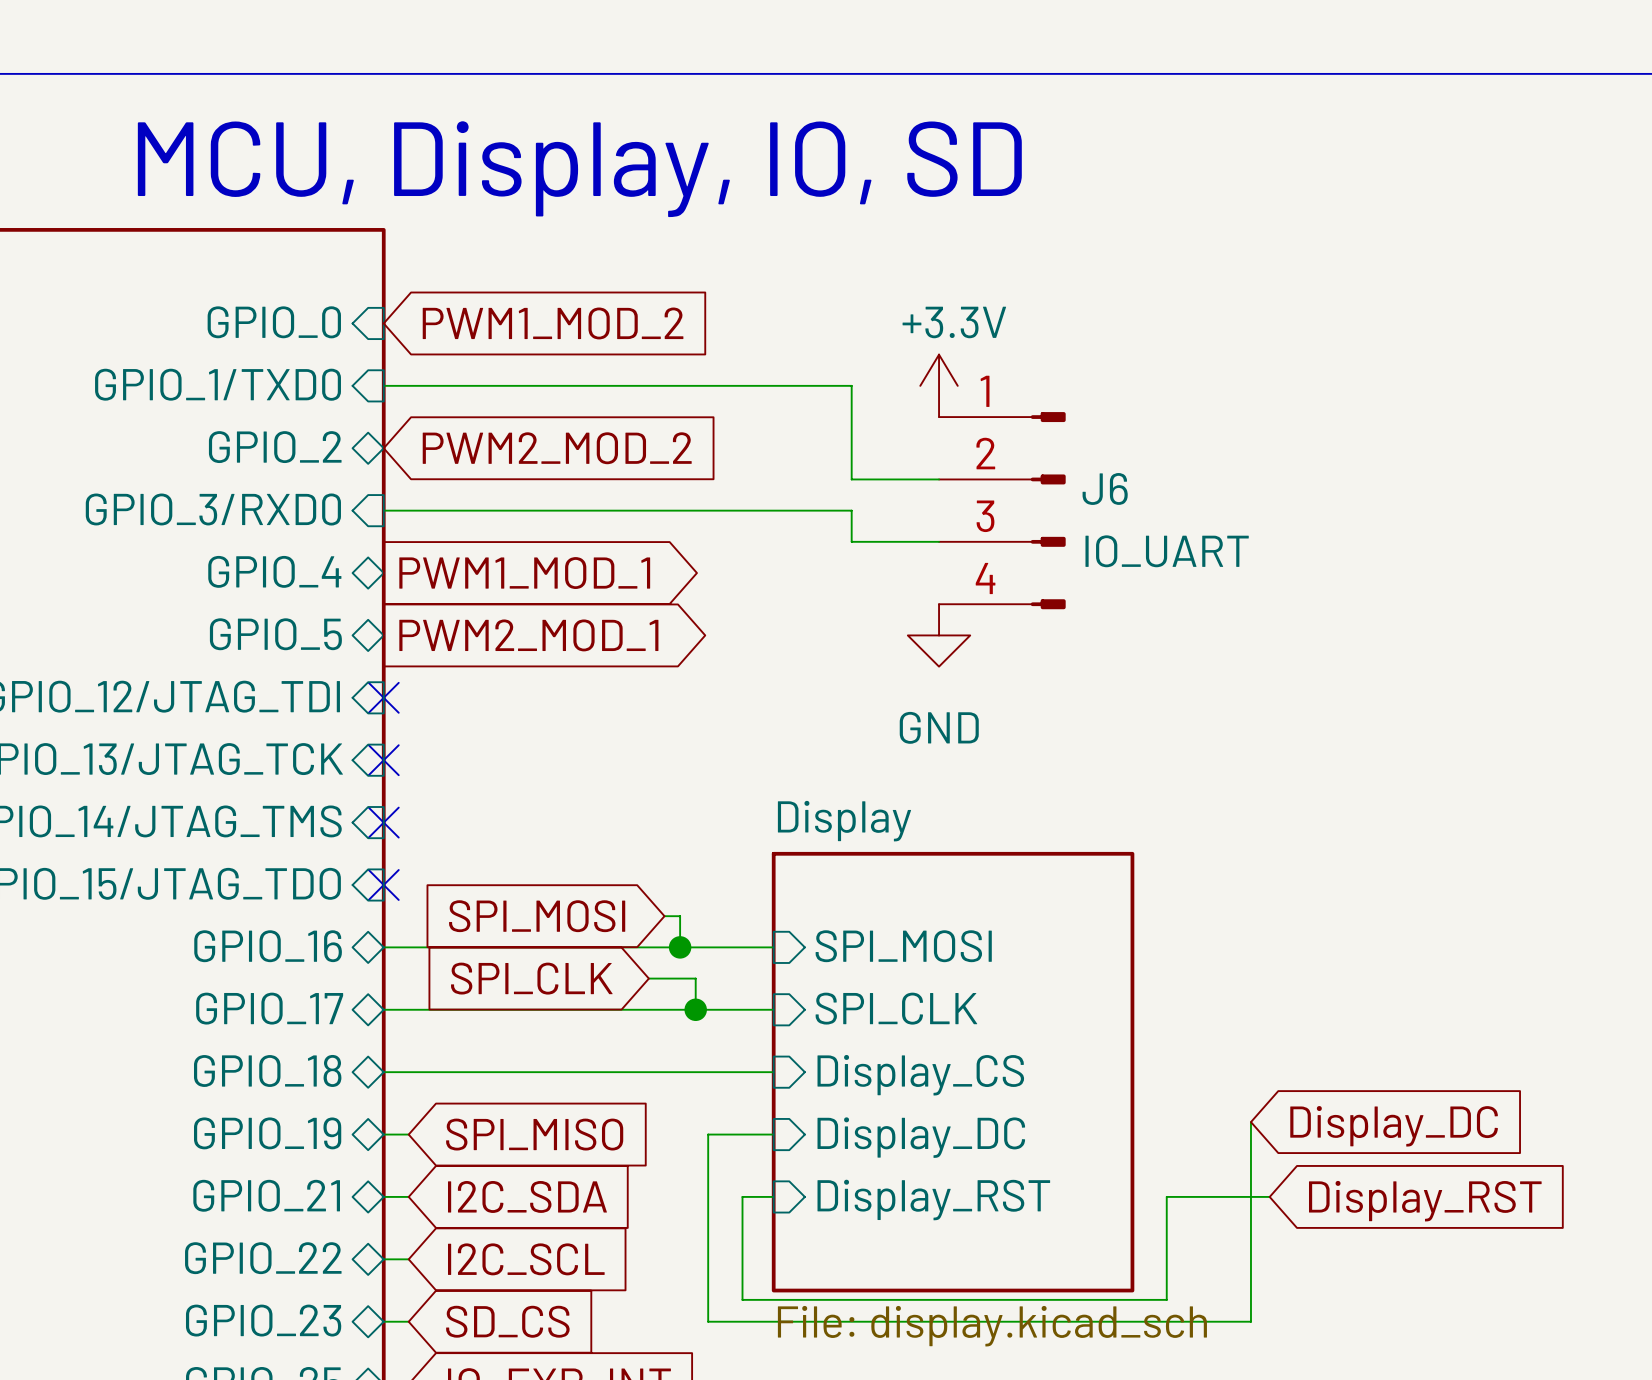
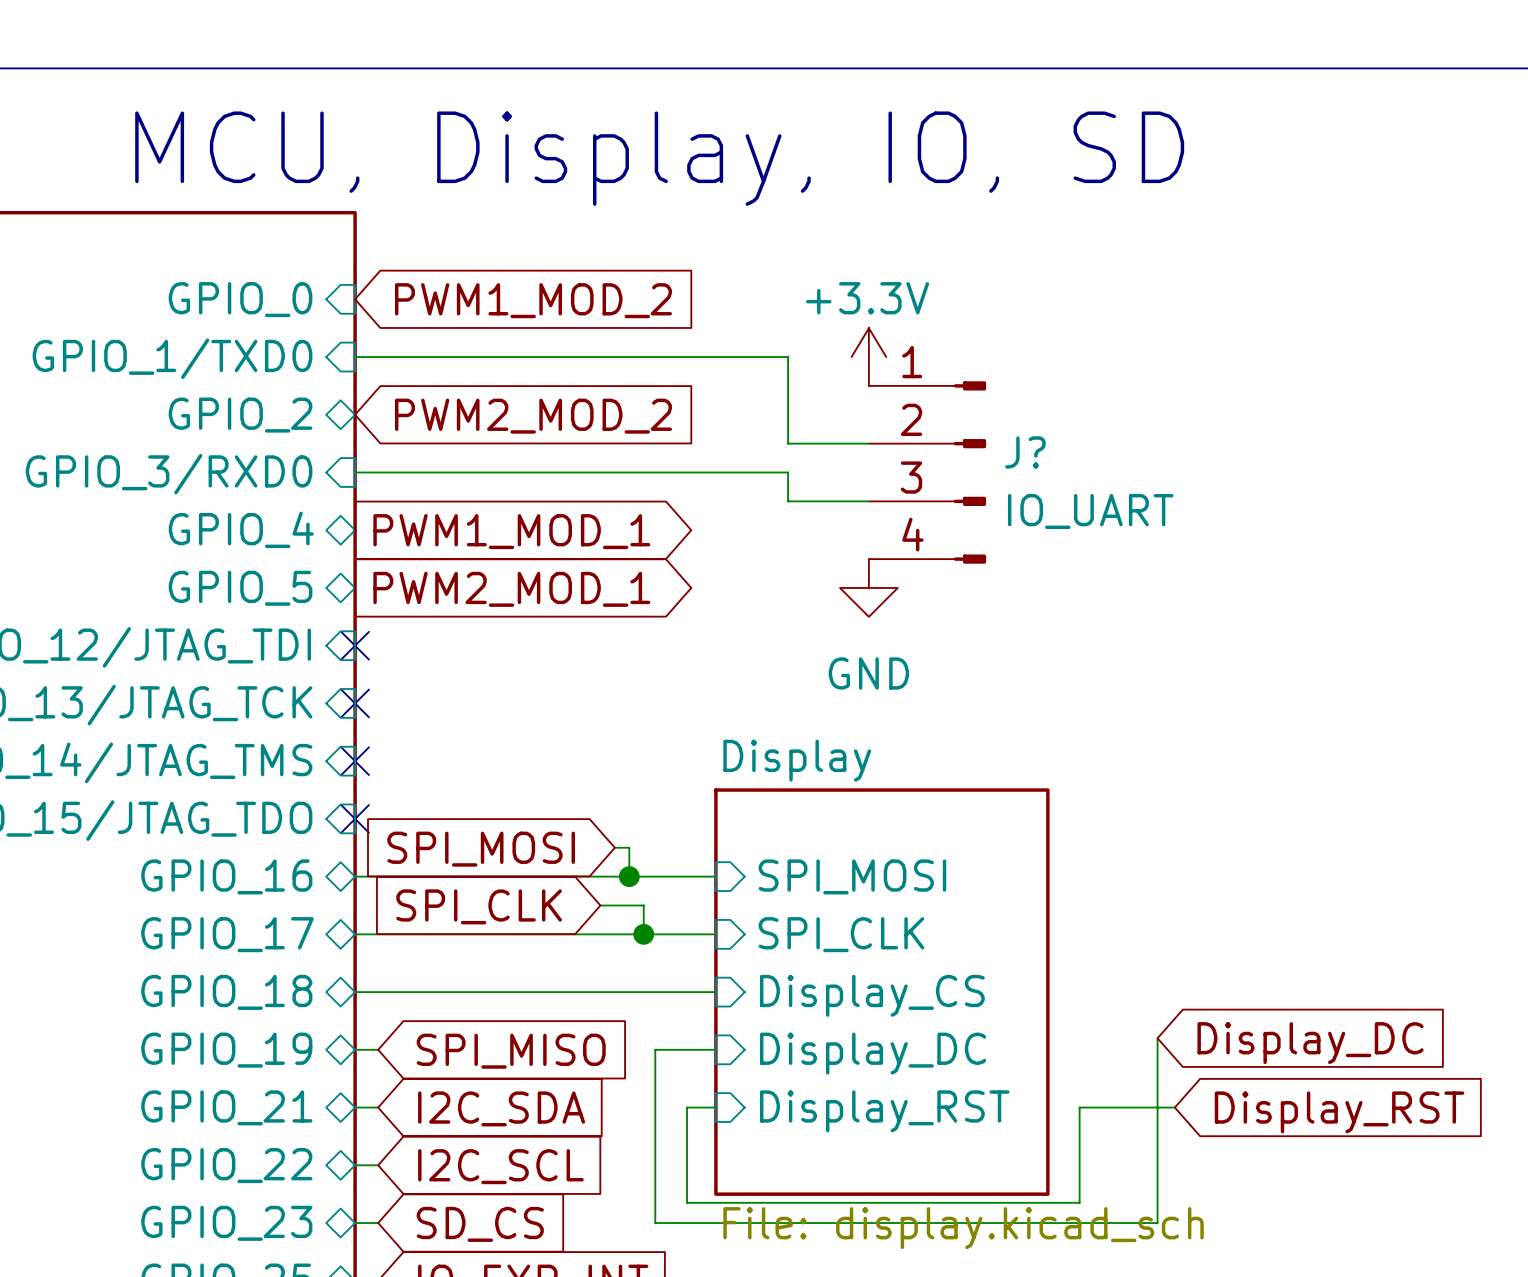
J6 name: J6 (1105, 488) -> J? (1025, 452)

